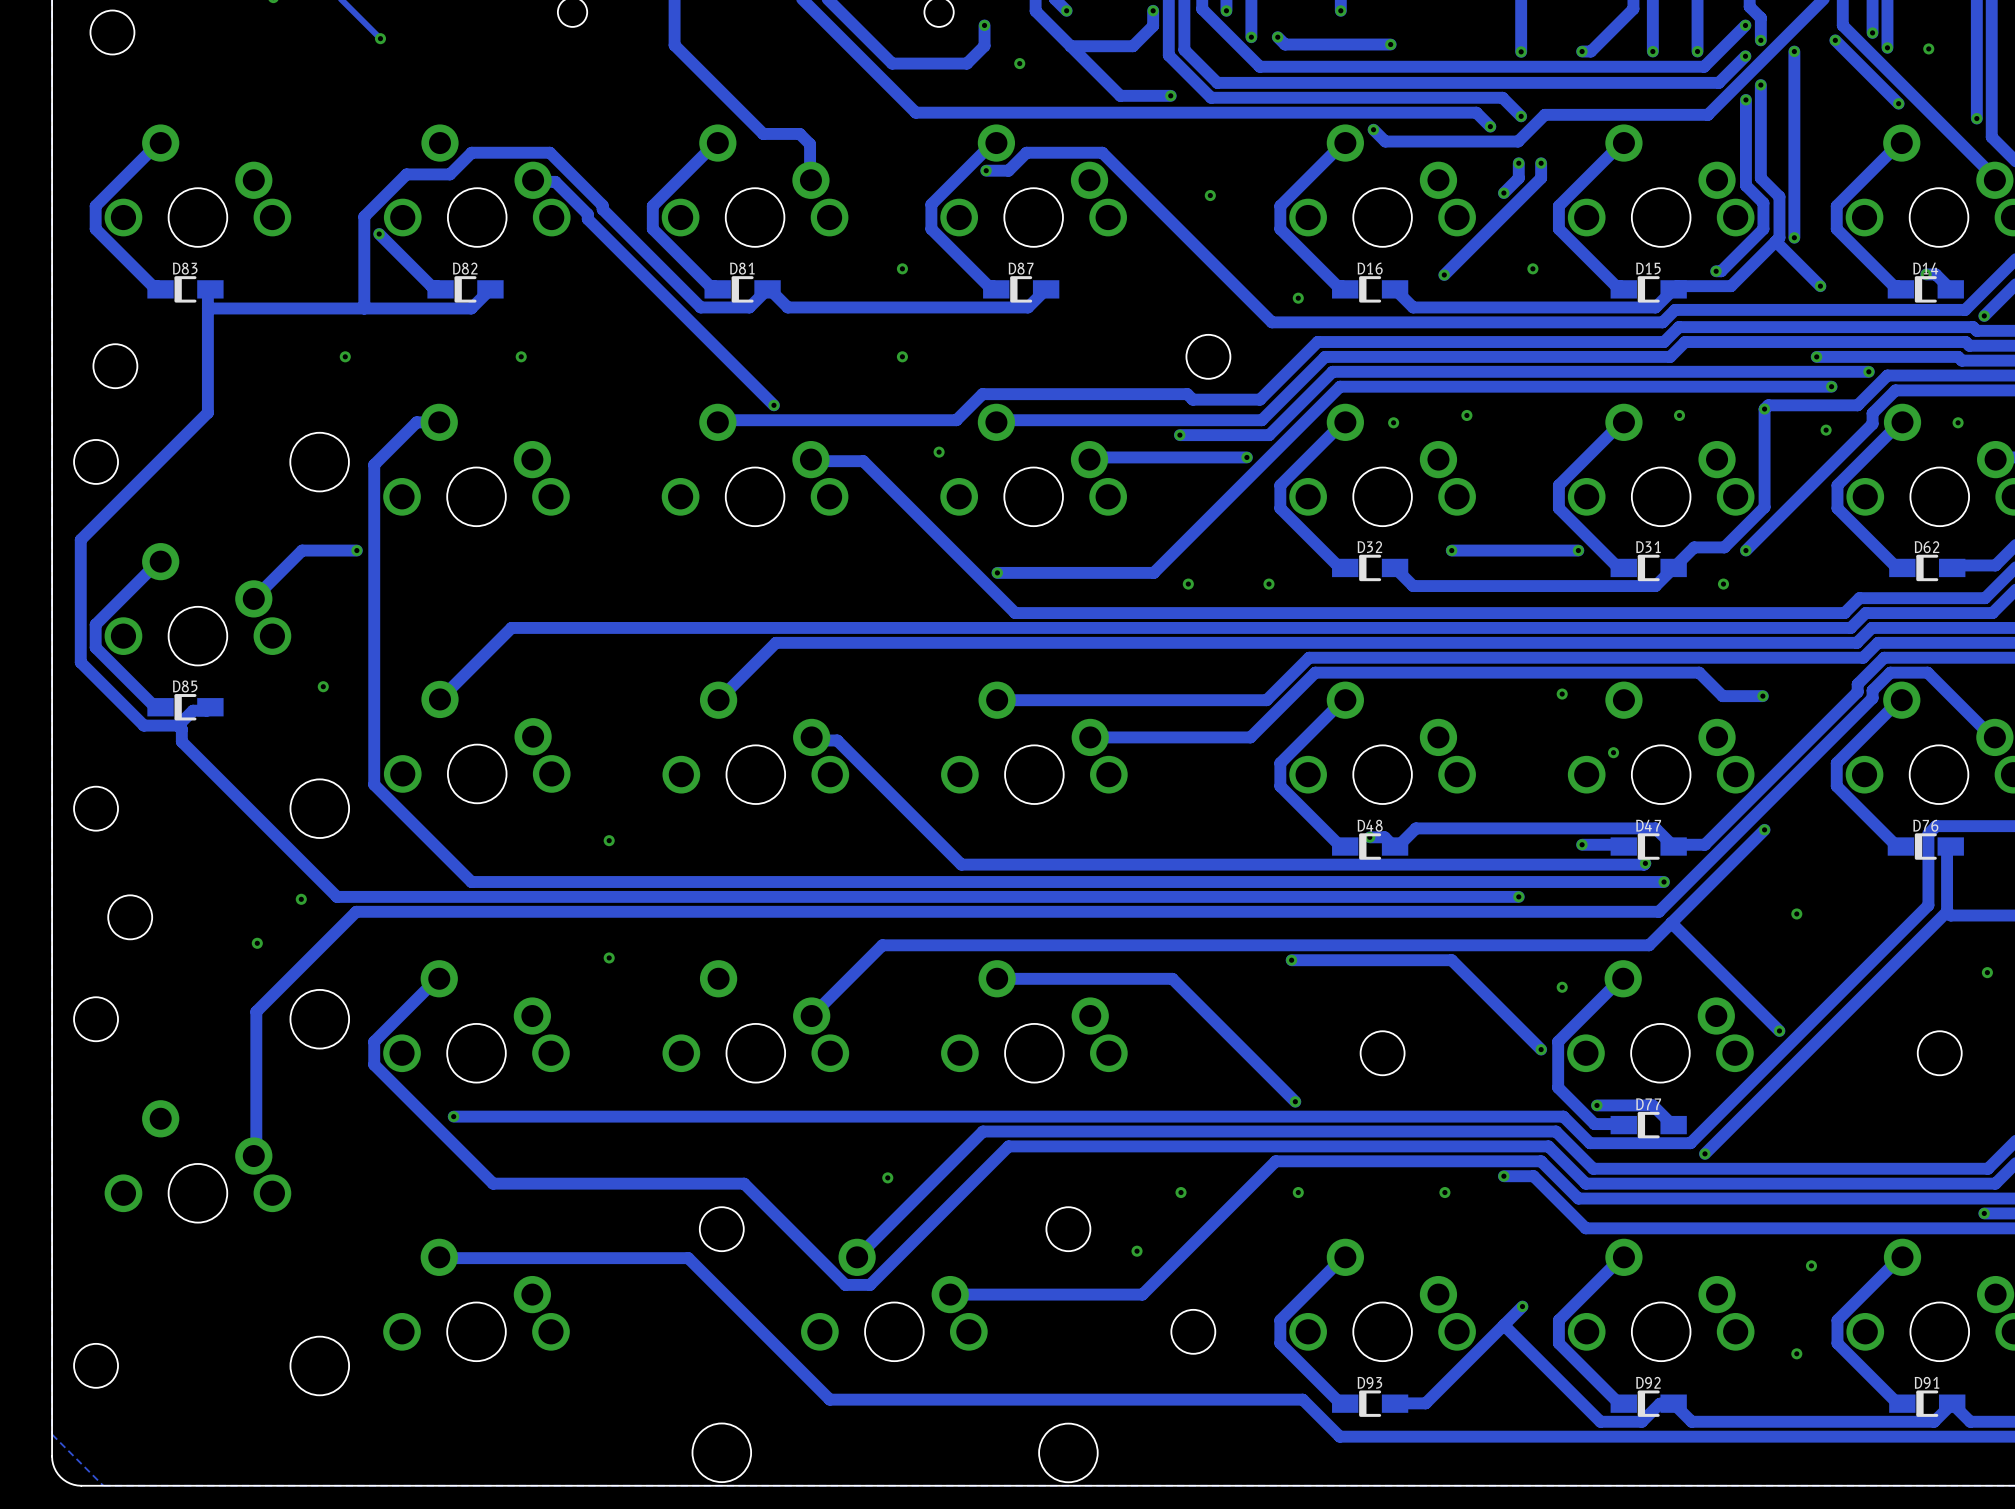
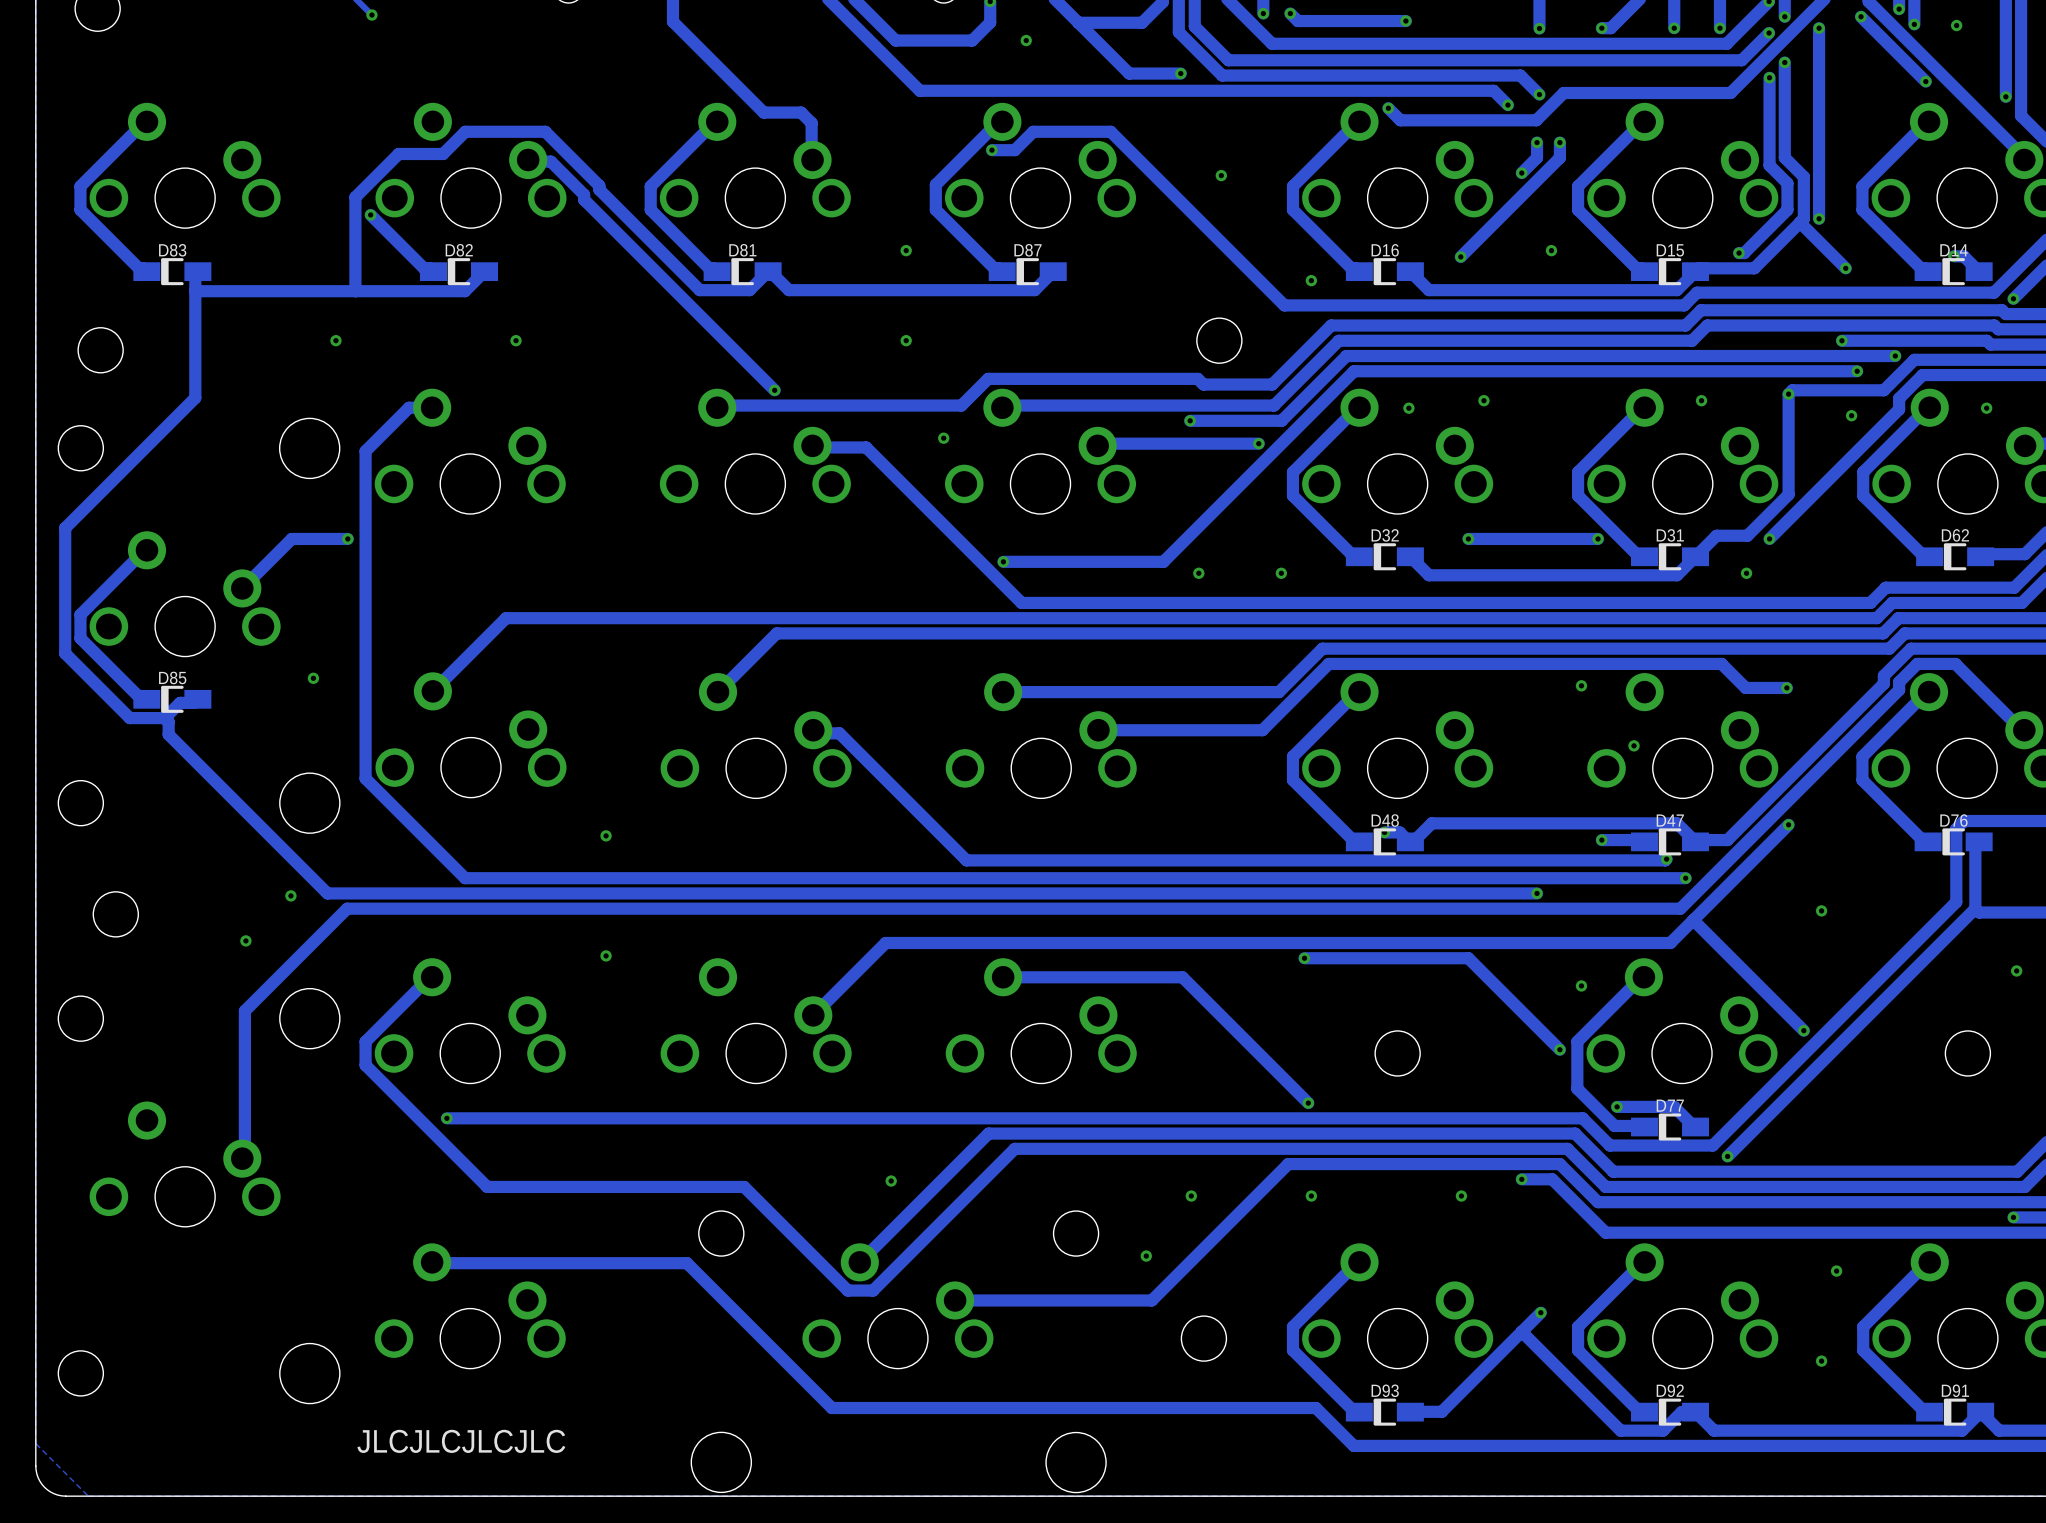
text: none -> JLCJLCJLCJLC (461, 1441)

